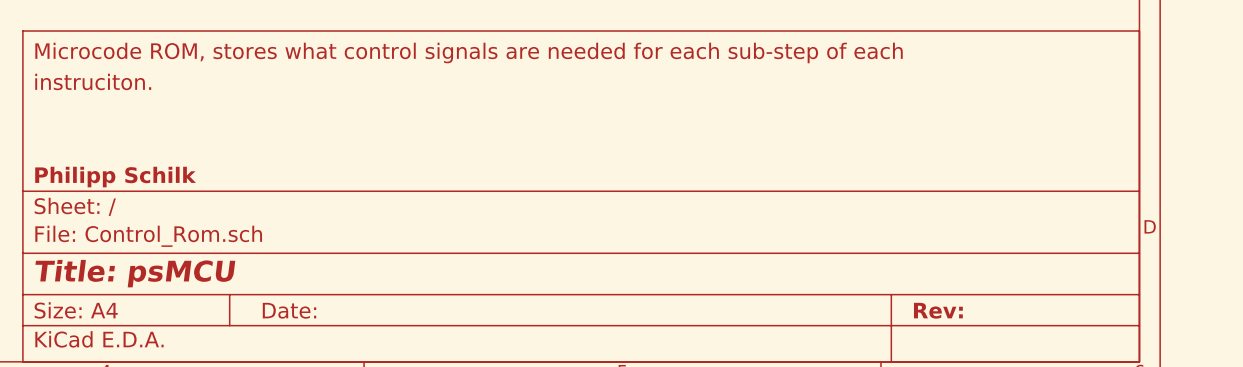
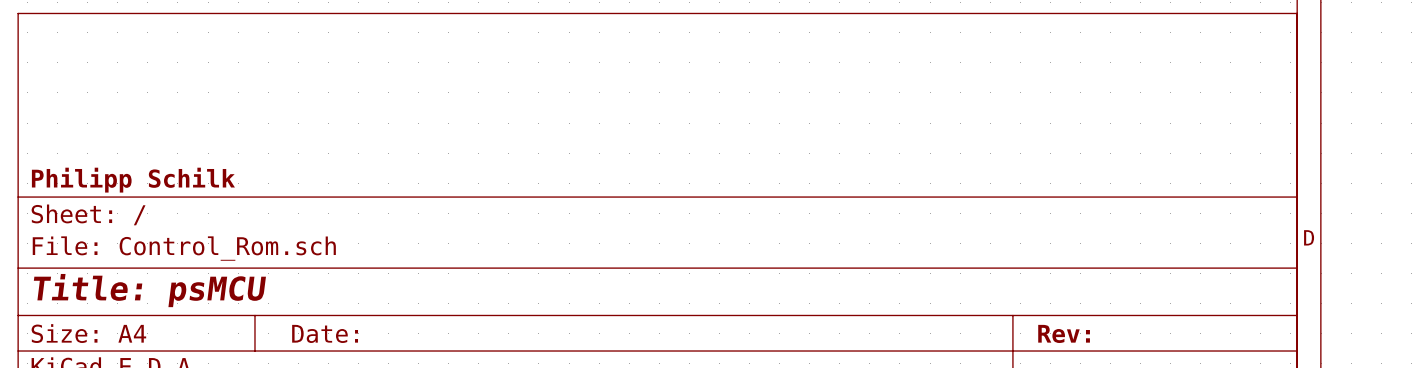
title block: Microcode ROM, stores what control signals are needed for each sub-step of each (469, 52) -> none
title block: instruciton. (93, 81) -> none

